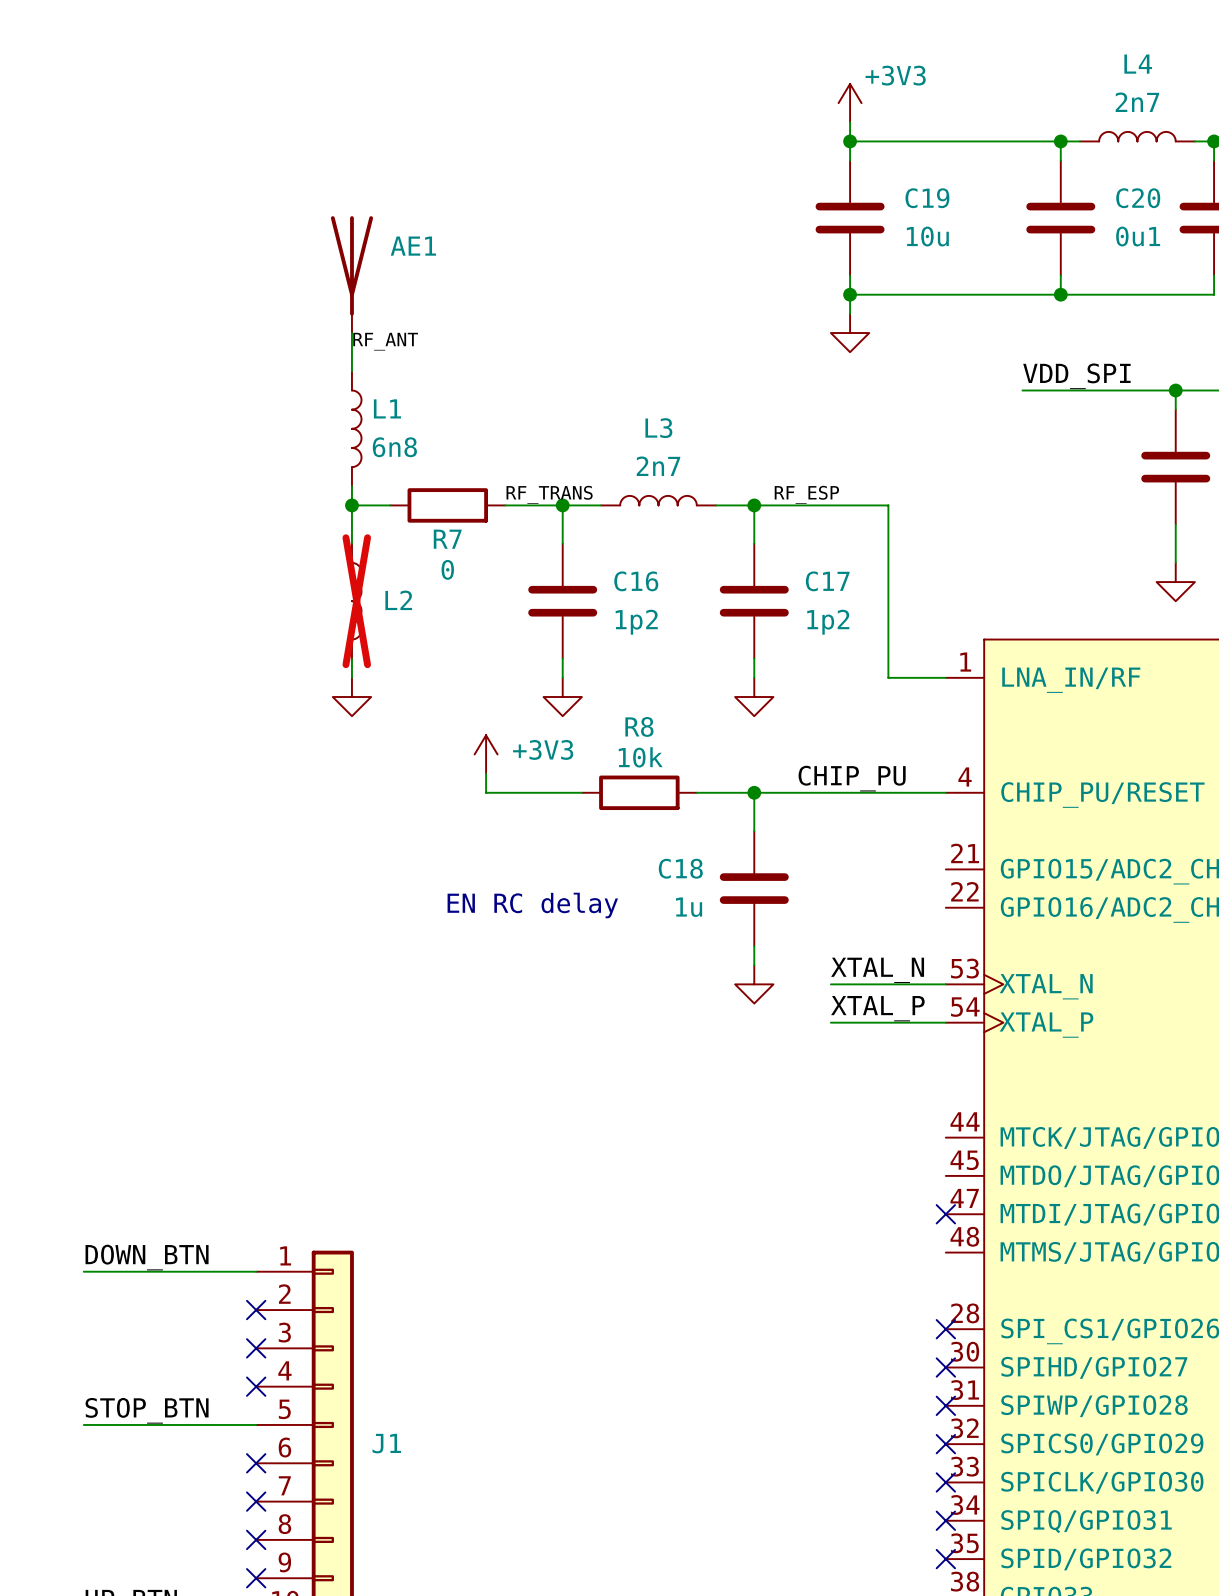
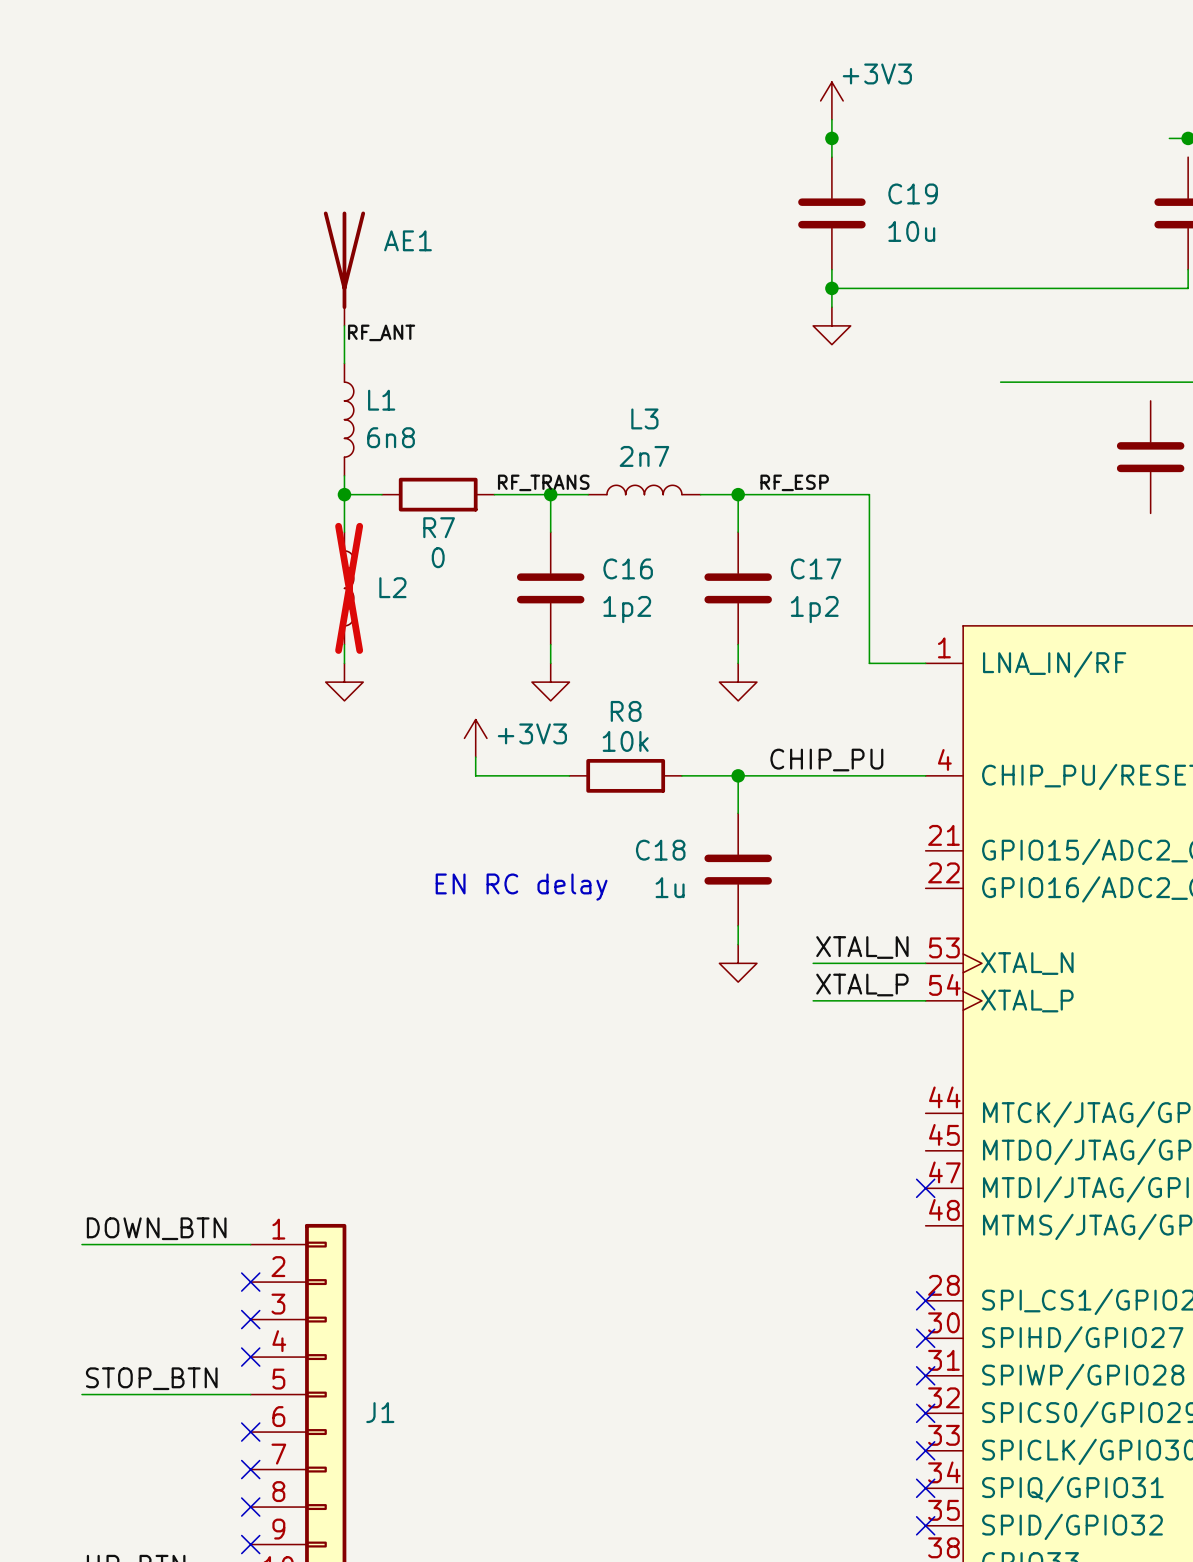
L4: 2n7 (1137, 136) -> none
wire: (850, 141) (1079, 141) -> none
wire: (1060, 141) (1060, 160) -> none
junction: (1060, 141) -> none
wire: (1214, 141) (1214, 160) -> none
C20: 0u1 (1060, 218) -> none
wire: (1060, 275) (1060, 294) -> none
junction: (1060, 294) -> none
label: VDD_SPI (1076, 376) -> none
wire: (1175, 390) (1175, 409) -> none
junction: (1175, 390) -> none
wire: (1175, 524) (1175, 562) -> none
power symbol: (1175, 582) -> none

